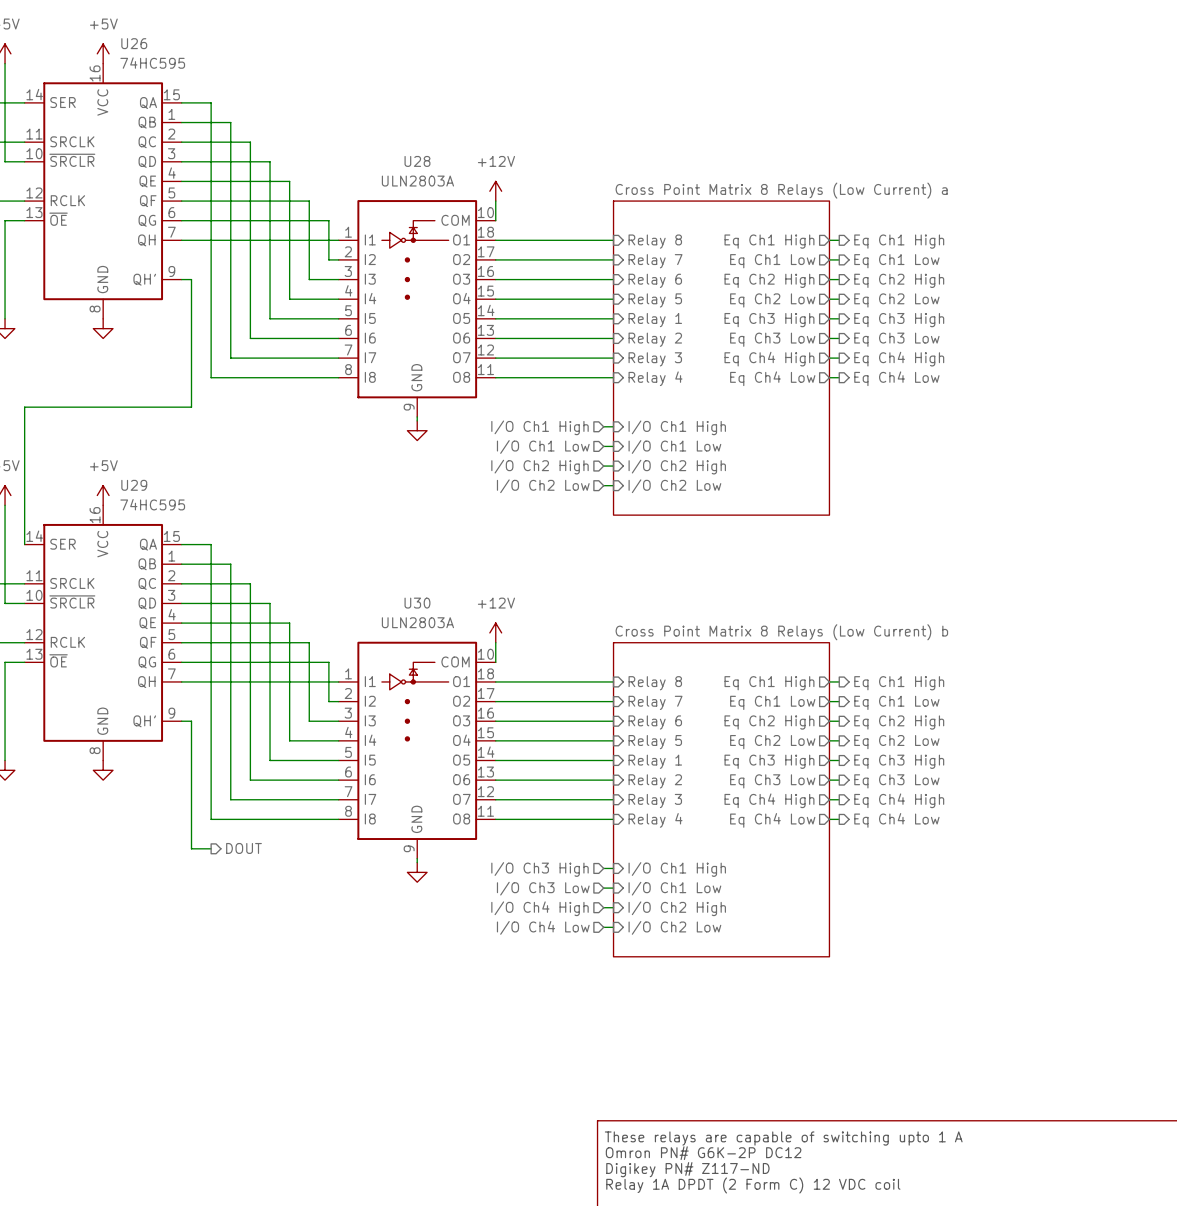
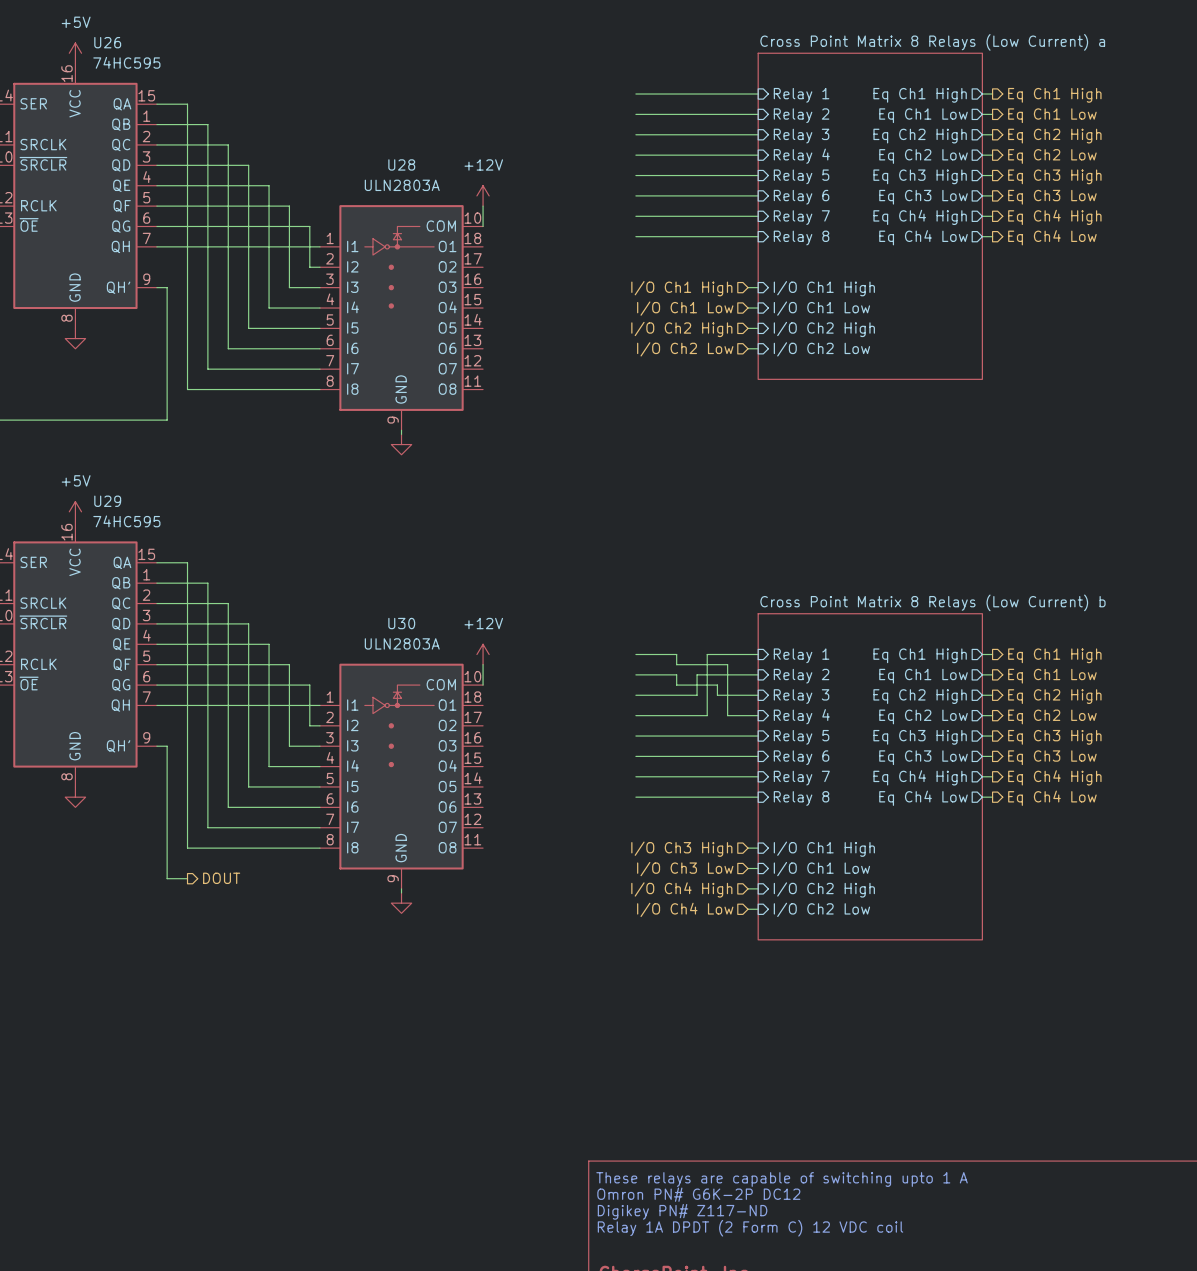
wire: none -> (635, 94) (758, 94)
wire: none -> (982, 94) (992, 94)
sheet pin: none -> Relay 1 (801, 95)
sheet pin: none -> Eq Ch1 High (920, 95)
hierarchical label: none -> Eq Ch1 High (1054, 95)
wire: none -> (635, 114) (758, 114)
wire: none -> (982, 114) (992, 114)
sheet pin: none -> Relay 2 (801, 115)
sheet pin: none -> Eq Ch1 Low (923, 115)
hierarchical label: none -> Eq Ch1 Low (1052, 115)
wire: none -> (635, 134) (758, 134)
wire: none -> (982, 134) (992, 134)
sheet pin: none -> Relay 3 (801, 136)
sheet pin: none -> Eq Ch2 High (920, 136)
hierarchical label: none -> Eq Ch2 High (1054, 136)
wire: none -> (635, 155) (758, 155)
wire: none -> (982, 155) (992, 155)
sheet pin: none -> Relay 4 (801, 156)
sheet pin: none -> Eq Ch2 Low (923, 156)
hierarchical label: none -> Eq Ch2 Low (1052, 156)
wire: none -> (635, 175) (758, 175)
wire: none -> (982, 175) (992, 175)
sheet pin: none -> Relay 5 (801, 176)
sheet pin: none -> Eq Ch3 High (920, 176)
hierarchical label: none -> Eq Ch3 High (1054, 176)
sheet pin: none -> Eq Ch3 Low (923, 197)
hierarchical label: none -> Eq Ch3 Low (1052, 197)
sheet pin: none -> Eq Ch4 High (920, 217)
hierarchical label: none -> Eq Ch4 High (1054, 217)
sheet pin: none -> Eq Ch4 Low (923, 237)
hierarchical label: none -> Eq Ch4 Low (1052, 237)
wire: (495, 240) (613, 240) -> (635, 195) (758, 195)
wire: (829, 240) (839, 240) -> (982, 195) (992, 195)
sheet pin position: Relay 8 (655, 241) -> Relay 8 (801, 237)
sheet pin: Eq Ch1 High (769, 241) -> none
hierarchical label: Eq Ch1 High (899, 241) -> none
wire: (495, 259) (613, 259) -> (635, 216) (758, 216)
wire: (829, 259) (839, 259) -> (982, 216) (992, 216)
sheet pin position: Relay 7 (655, 261) -> Relay 7 (801, 217)
sheet pin: Eq Ch1 Low (772, 261) -> none
hierarchical label: Eq Ch1 Low (896, 261) -> none
wire: (495, 279) (613, 279) -> (635, 236) (758, 236)
wire: (829, 279) (839, 279) -> (982, 236) (992, 236)
sheet pin position: Relay 6 (655, 280) -> Relay 6 (801, 197)
hierarchical label: none -> I/O Ch1 High (681, 288)
sheet pin shape: output (769, 280) -> input (824, 288)
sheet pin: Eq Ch2 High (769, 280) -> I/O Ch1 High (824, 288)
hierarchical label: Eq Ch2 High (899, 280) -> none
wire: (495, 299) (613, 299) -> none
hierarchical label: none -> I/O Ch1 Low (685, 308)
wire: (829, 299) (839, 299) -> (748, 328) (758, 328)
sheet pin: Relay 5 (655, 300) -> none
sheet pin shape: output (772, 300) -> input (821, 308)
sheet pin: Eq Ch2 Low (772, 300) -> I/O Ch1 Low (821, 308)
hierarchical label: Eq Ch2 Low (896, 300) -> none
wire: (495, 318) (613, 318) -> none
wire: (829, 318) (839, 318) -> (748, 308) (758, 308)
hierarchical label: none -> I/O Ch2 High (681, 329)
sheet pin: Relay 1 (655, 320) -> none
sheet pin shape: output (769, 320) -> input (824, 329)
sheet pin: Eq Ch3 High (769, 320) -> I/O Ch2 High (824, 329)
hierarchical label: Eq Ch3 High (899, 320) -> none
wire: (495, 338) (613, 338) -> none
wire: (829, 338) (839, 338) -> (748, 287) (758, 287)
sheet pin: Relay 2 (655, 339) -> none
hierarchical label: none -> I/O Ch2 Low (685, 349)
sheet pin shape: output (772, 339) -> input (821, 349)
sheet pin: Eq Ch3 Low (772, 339) -> I/O Ch2 Low (821, 349)
hierarchical label: Eq Ch3 Low (896, 339) -> none
wire: (495, 358) (613, 358) -> none
sheet Cross Point Matrix 8 Relays (Low Current) a position: (721, 358) -> (870, 216)
wire: (829, 358) (839, 358) -> none
sheet pin: Relay 3 (655, 359) -> none
sheet pin: Eq Ch4 High (769, 359) -> none
hierarchical label: Eq Ch4 High (899, 359) -> none
wire: (495, 377) (613, 377) -> none
wire: (829, 377) (839, 377) -> none
sheet pin: Relay 4 (655, 378) -> none
sheet pin: Eq Ch4 Low (772, 378) -> none
hierarchical label: Eq Ch4 Low (896, 378) -> none
wire: (603, 426) (613, 426) -> (748, 348) (758, 348)
hierarchical label: I/O Ch1 High (540, 427) -> none
sheet pin: I/O Ch1 High (677, 427) -> none
hierarchical label: I/O Ch1 Low (543, 446) -> none
wire: (603, 446) (613, 446) -> none
sheet pin: I/O Ch1 Low (674, 446) -> none
wire: (603, 466) (613, 466) -> none
hierarchical label: I/O Ch2 High (540, 467) -> none
sheet pin: I/O Ch2 High (677, 467) -> none
wire: (603, 485) (613, 485) -> none
hierarchical label: I/O Ch2 Low (543, 486) -> none
sheet pin: I/O Ch2 Low (674, 486) -> none
wire: none -> (635, 654) (676, 654) (676, 664) (727, 664) (727, 715) (758, 715)
wire: none -> (758, 654) (707, 654) (707, 715) (635, 715)
sheet pin: none -> Relay 1 (801, 655)
wire: none -> (635, 674) (676, 674) (676, 685) (717, 685) (717, 695) (758, 695)
wire: none -> (758, 674) (697, 674) (697, 695) (635, 695)
sheet pin: none -> Relay 2 (801, 676)
sheet pin: none -> Relay 3 (801, 696)
wire: (495, 681) (613, 681) -> none
wire: (829, 681) (839, 681) -> (982, 654) (992, 654)
sheet pin position: Relay 8 (655, 683) -> Relay 8 (801, 798)
sheet pin position: Eq Ch1 High (769, 683) -> Eq Ch1 High (920, 655)
hierarchical label position: Eq Ch1 High (899, 683) -> Eq Ch1 High (1054, 655)
sheet pin: none -> Relay 4 (801, 716)
wire: (495, 701) (613, 701) -> none
wire: (829, 701) (839, 701) -> (982, 674) (992, 674)
sheet pin position: Relay 7 (655, 702) -> Relay 7 (801, 778)
sheet pin position: Eq Ch1 Low (772, 702) -> Eq Ch1 Low (923, 676)
hierarchical label position: Eq Ch1 Low (896, 702) -> Eq Ch1 Low (1052, 676)
wire: (495, 721) (613, 721) -> none
wire: (829, 721) (839, 721) -> (982, 695) (992, 695)
sheet pin position: Relay 6 (655, 722) -> Relay 6 (801, 757)
sheet pin position: Eq Ch2 High (769, 722) -> Eq Ch2 High (920, 696)
hierarchical label position: Eq Ch2 High (899, 722) -> Eq Ch2 High (1054, 696)
wire: (495, 740) (613, 740) -> none
wire: (829, 740) (839, 740) -> (982, 715) (992, 715)
sheet pin position: Relay 5 (655, 742) -> Relay 5 (801, 737)
sheet pin position: Eq Ch2 Low (772, 742) -> Eq Ch2 Low (923, 716)
hierarchical label position: Eq Ch2 Low (896, 742) -> Eq Ch2 Low (1052, 716)
wire: (495, 760) (613, 760) -> (635, 736) (758, 736)
wire: (829, 760) (839, 760) -> (982, 736) (992, 736)
sheet pin: Relay 1 (655, 761) -> none
sheet pin position: Eq Ch3 High (769, 761) -> Eq Ch3 High (920, 737)
hierarchical label position: Eq Ch3 High (899, 761) -> Eq Ch3 High (1054, 737)
wire: (495, 780) (613, 780) -> (635, 756) (758, 756)
wire: (829, 780) (839, 780) -> (982, 756) (992, 756)
sheet pin: Relay 2 (655, 781) -> none
sheet pin position: Eq Ch3 Low (772, 781) -> Eq Ch3 Low (923, 757)
hierarchical label position: Eq Ch3 Low (896, 781) -> Eq Ch3 Low (1052, 757)
wire: (495, 799) (613, 799) -> (635, 776) (758, 776)
sheet Cross Point Matrix 8 Relays (Low Current) b position: (721, 799) -> (870, 776)
wire: (829, 799) (839, 799) -> (982, 776) (992, 776)
sheet pin position: Eq Ch4 High (769, 800) -> Eq Ch4 High (920, 777)
hierarchical label position: Eq Ch4 High (899, 800) -> Eq Ch4 High (1054, 777)
sheet pin: Relay 3 (655, 801) -> none
wire: (495, 819) (613, 819) -> (635, 797) (758, 797)
wire: (829, 819) (839, 819) -> (982, 797) (992, 797)
sheet pin: Relay 4 (655, 820) -> none
sheet pin position: Eq Ch4 Low (772, 820) -> Eq Ch4 Low (923, 798)
hierarchical label position: Eq Ch4 Low (896, 820) -> Eq Ch4 Low (1052, 798)
wire: (603, 868) (613, 868) -> (748, 848) (758, 848)
hierarchical label position: I/O Ch3 High (540, 869) -> I/O Ch3 High (681, 849)
sheet pin position: I/O Ch1 High (677, 869) -> I/O Ch1 High (824, 849)
hierarchical label position: I/O Ch3 Low (543, 888) -> I/O Ch3 Low (685, 869)
wire: (603, 888) (613, 888) -> (748, 868) (758, 868)
sheet pin position: I/O Ch1 Low (674, 888) -> I/O Ch1 Low (821, 869)
wire: (603, 907) (613, 907) -> (748, 888) (758, 888)
hierarchical label position: I/O Ch4 High (540, 908) -> I/O Ch4 High (681, 889)
sheet pin position: I/O Ch2 High (677, 908) -> I/O Ch2 High (824, 889)
hierarchical label position: I/O Ch4 Low (543, 927) -> I/O Ch4 Low (685, 909)
wire: (603, 927) (613, 927) -> (748, 909) (758, 909)
sheet pin position: I/O Ch2 Low (674, 927) -> I/O Ch2 Low (821, 909)

